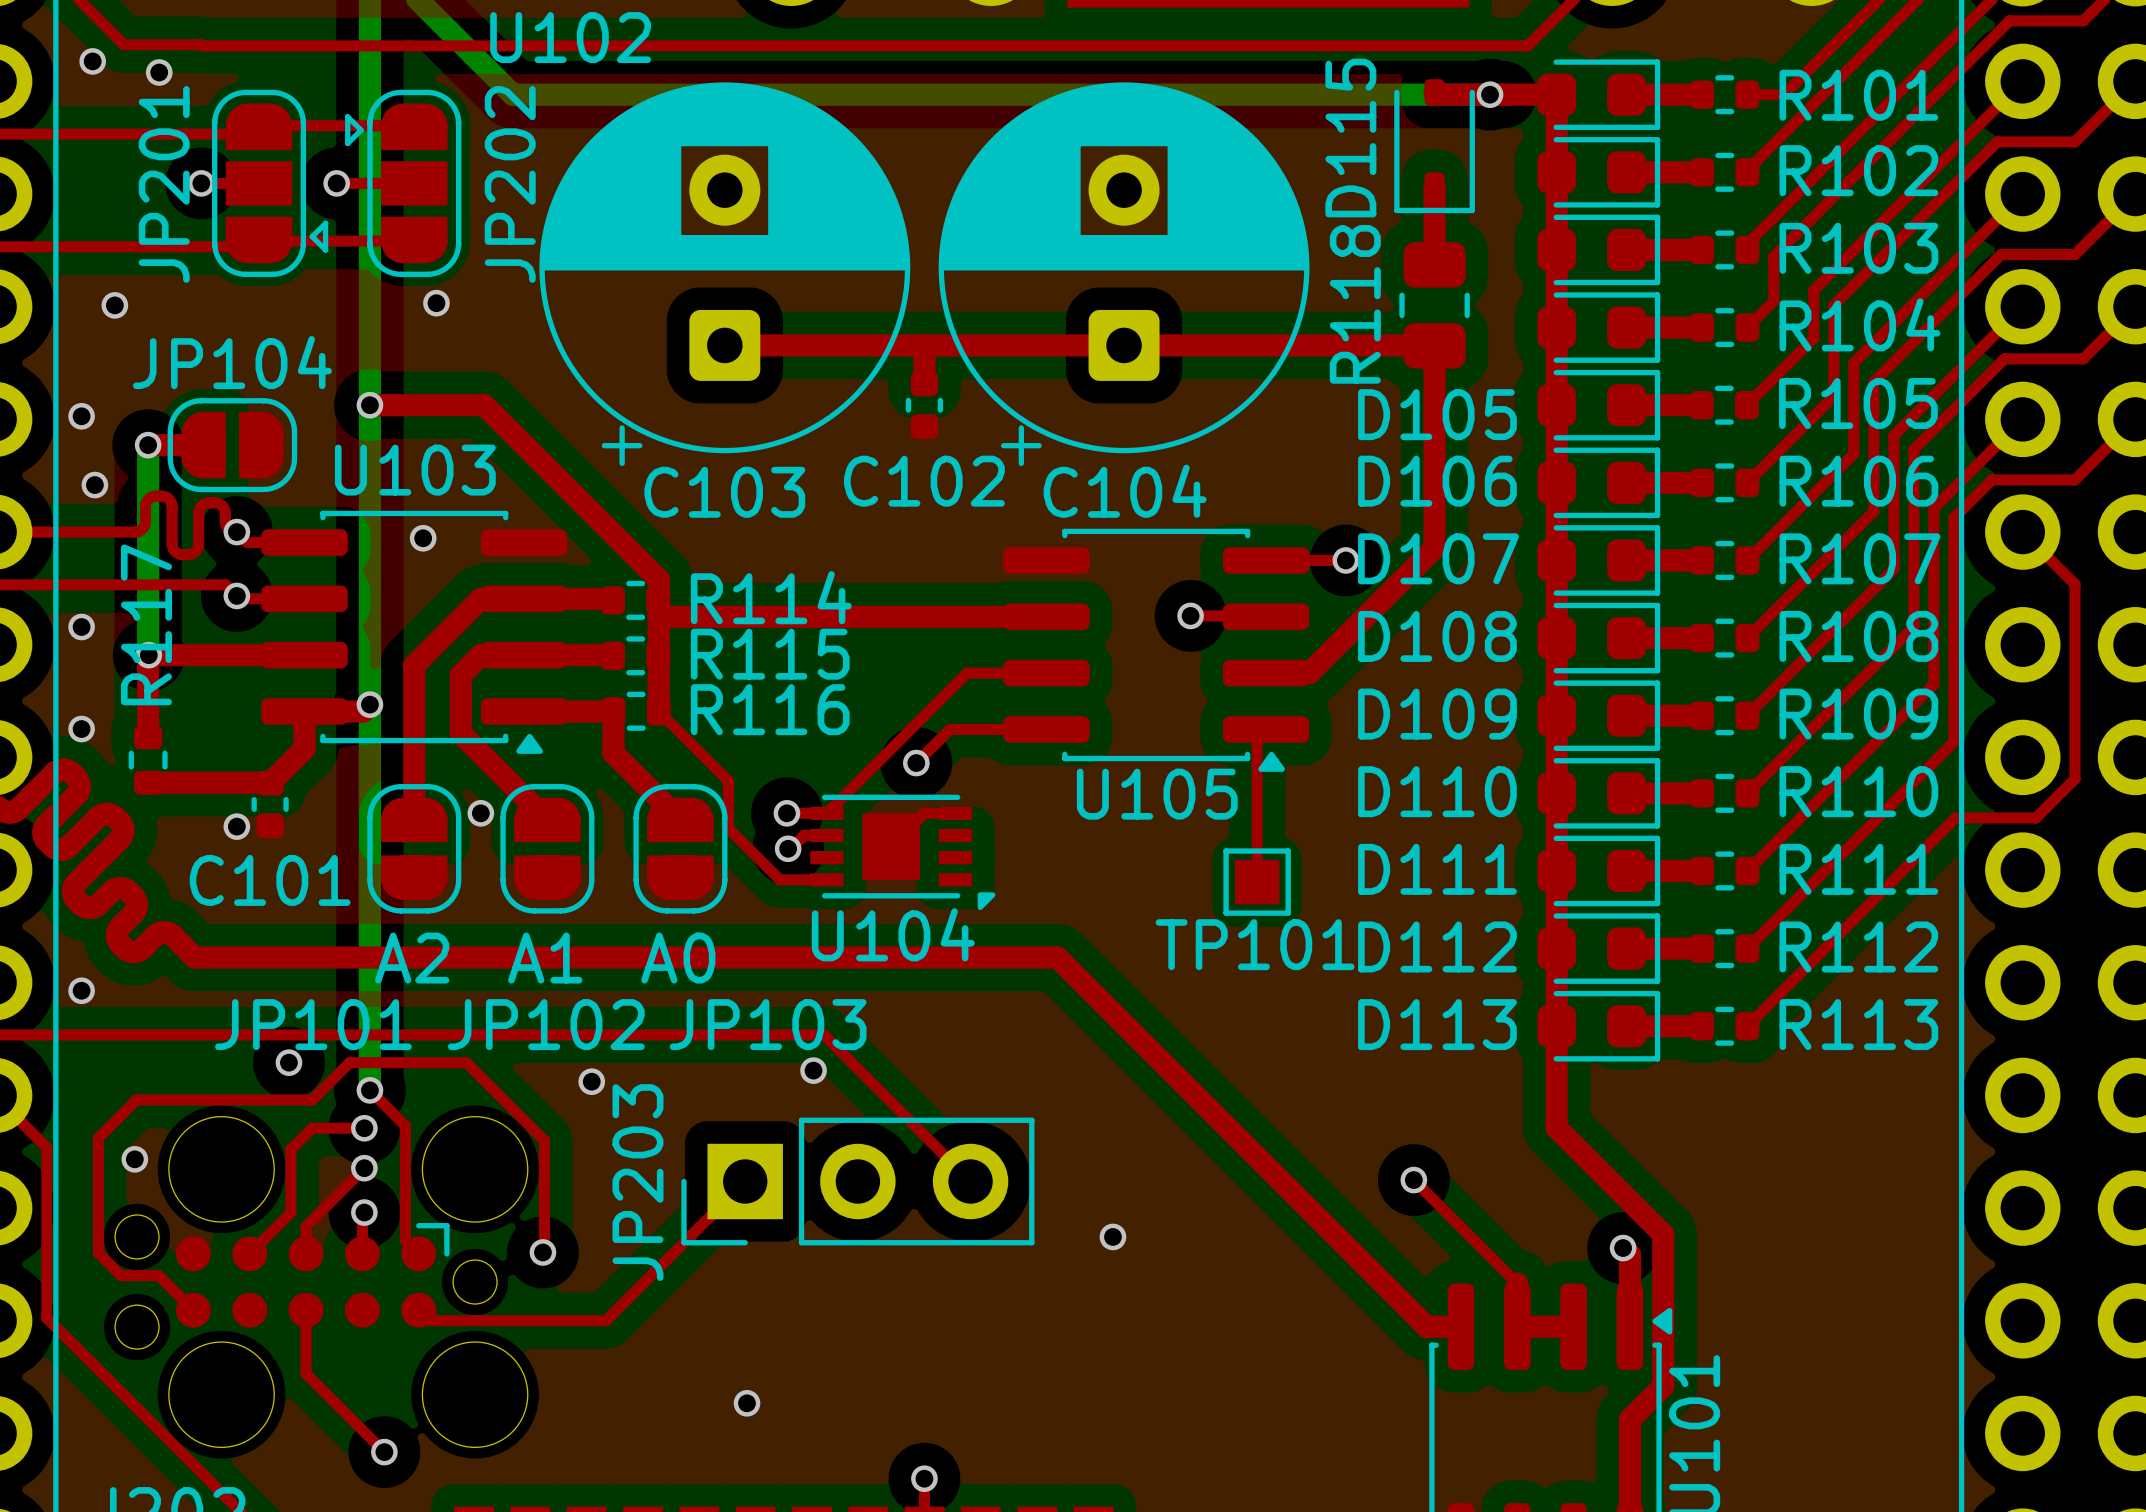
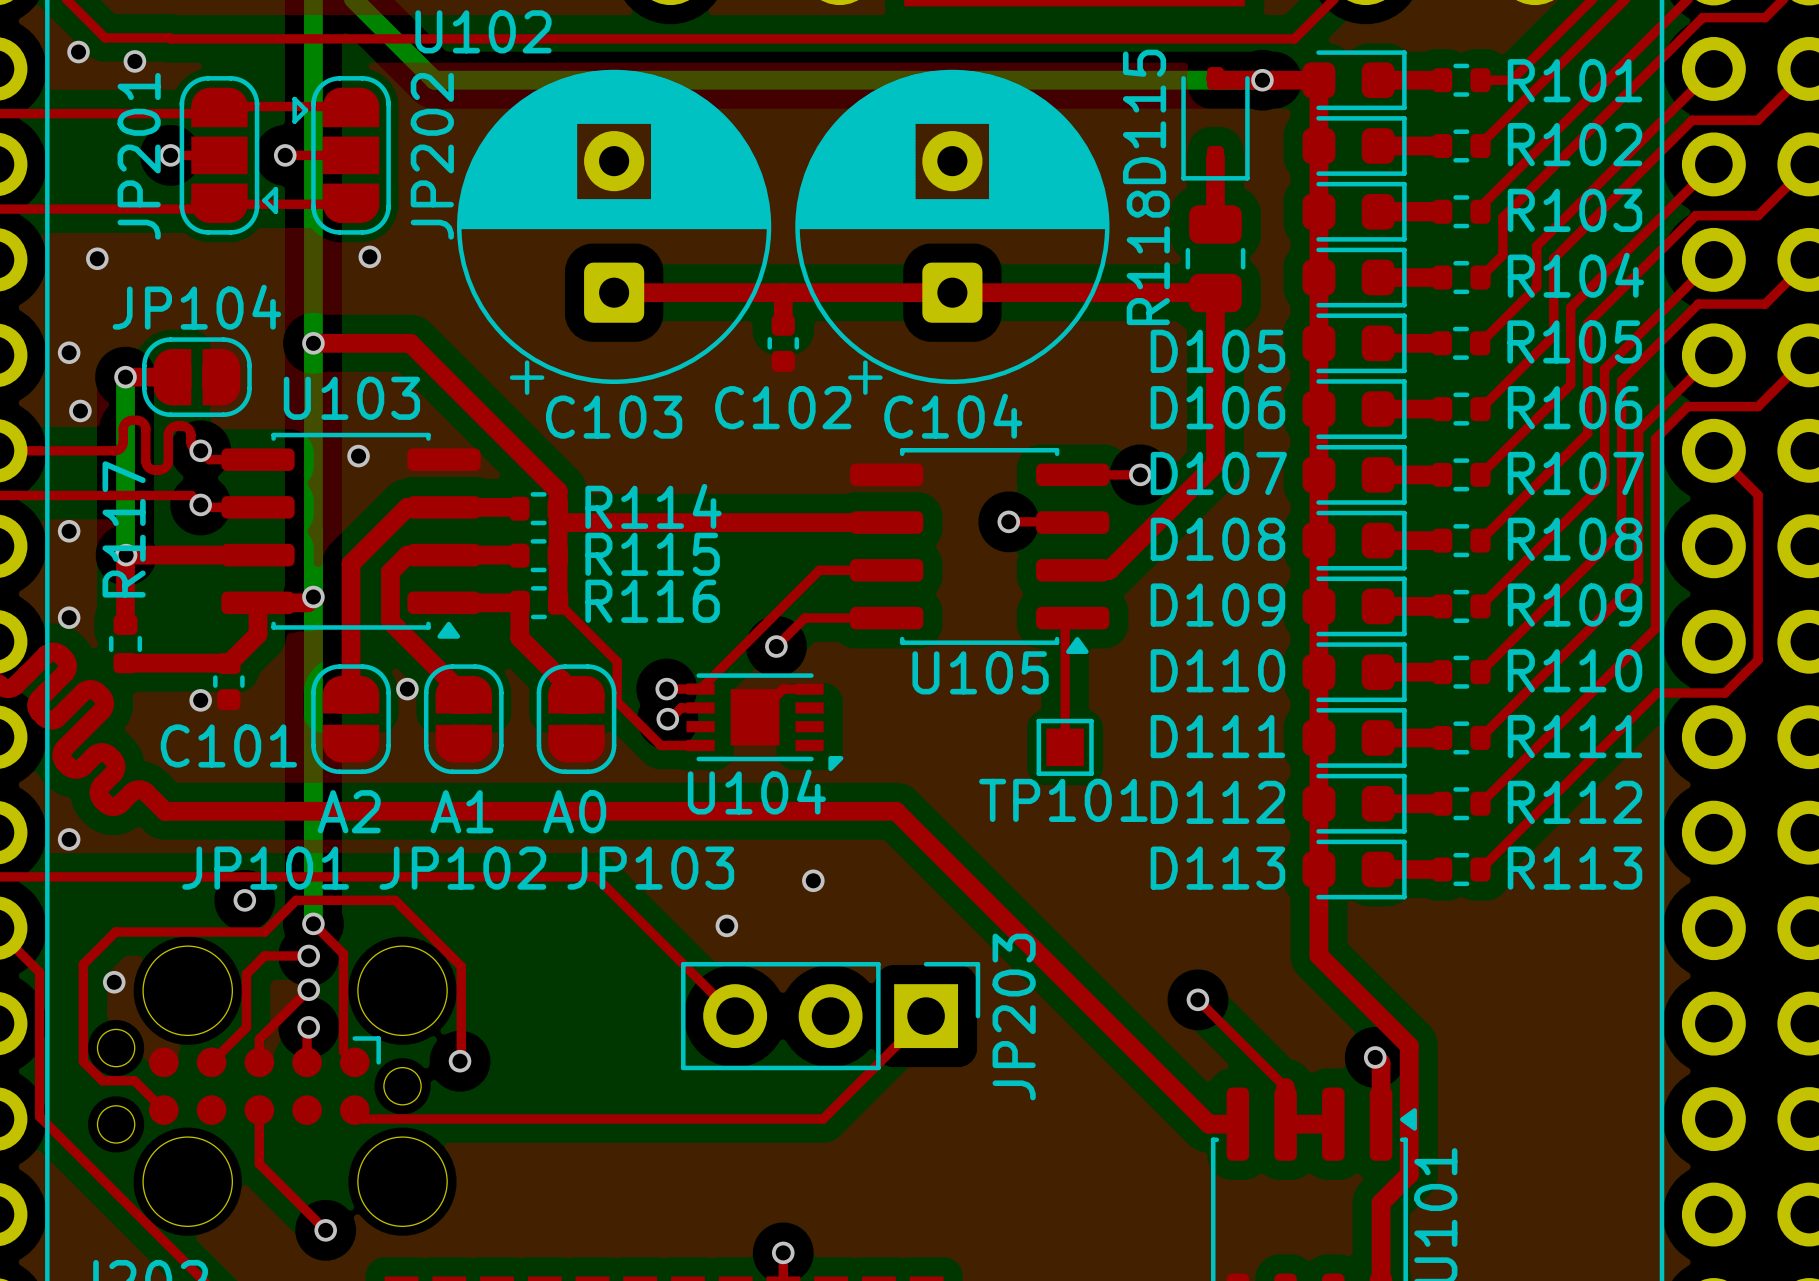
top track: (703, 1034) (824, 1034) (970, 1181) -> (595, 876) (735, 1016)
via: none -> (813, 880)
via position: (813, 1070) -> (726, 925)
via: (591, 1081) -> none
top track: (745, 1181) (606, 1320) -> (926, 1016) (823, 1118) (513, 1118)
JP203 rotation: 0° (857, 1181) -> 180° (830, 1016)
via: (1112, 1236) -> none
via: (747, 1403) -> none

